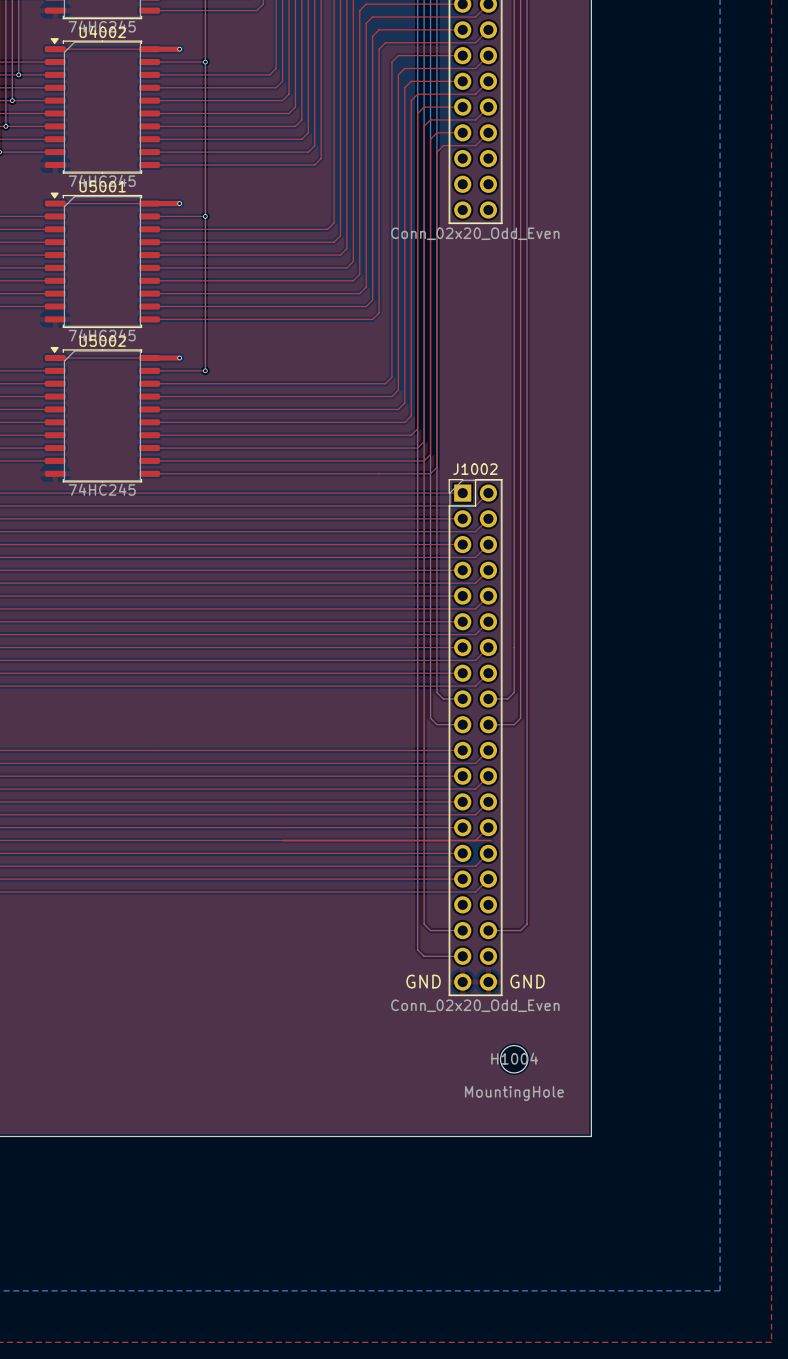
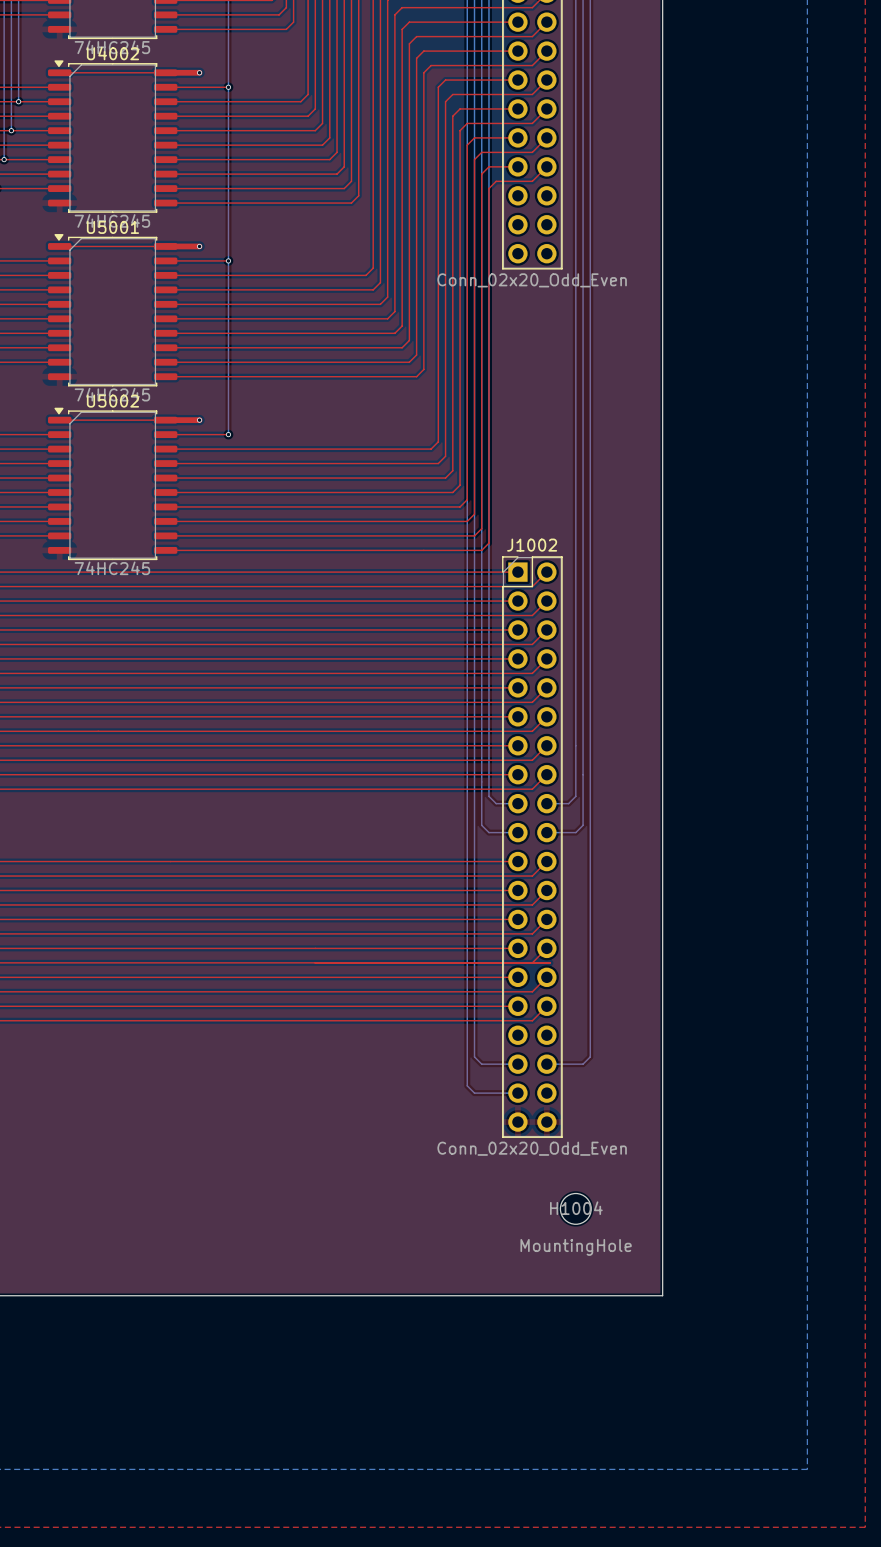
text: GND (423, 981) -> none
text: GND (527, 981) -> none

